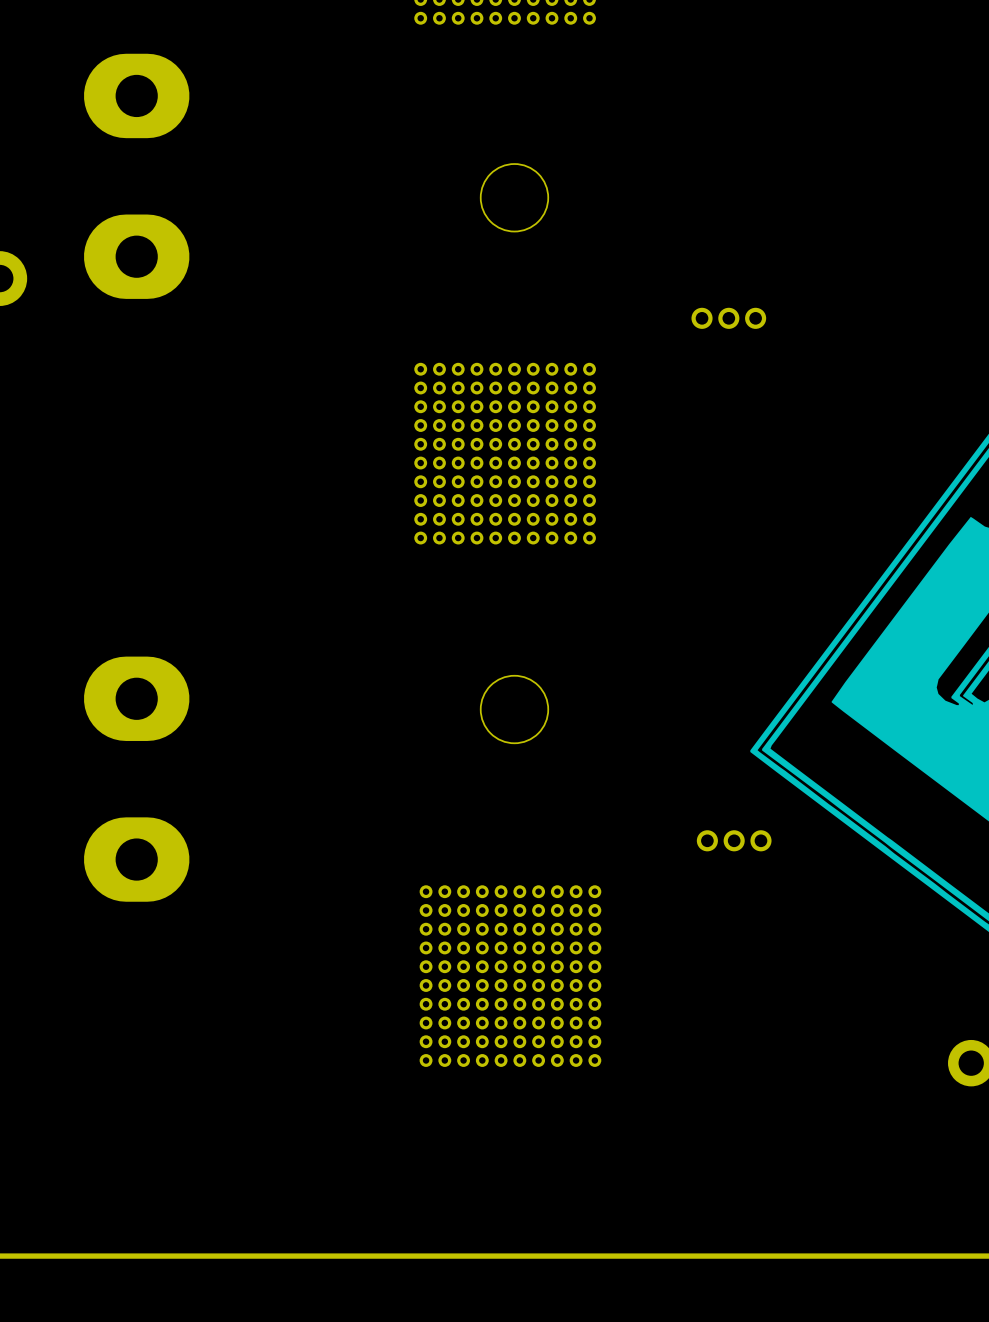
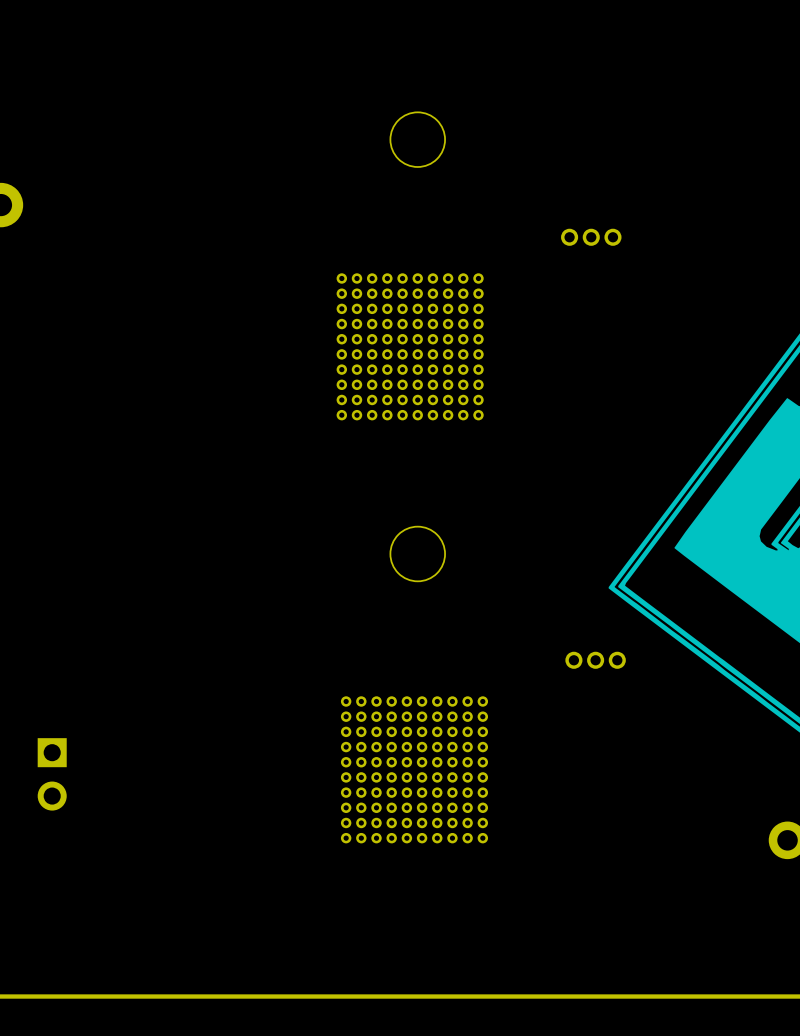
part: (136, 95) -> none
part: (136, 256) -> none
part: (136, 698) -> none
part: (136, 859) -> none
part: none -> (52, 774)

